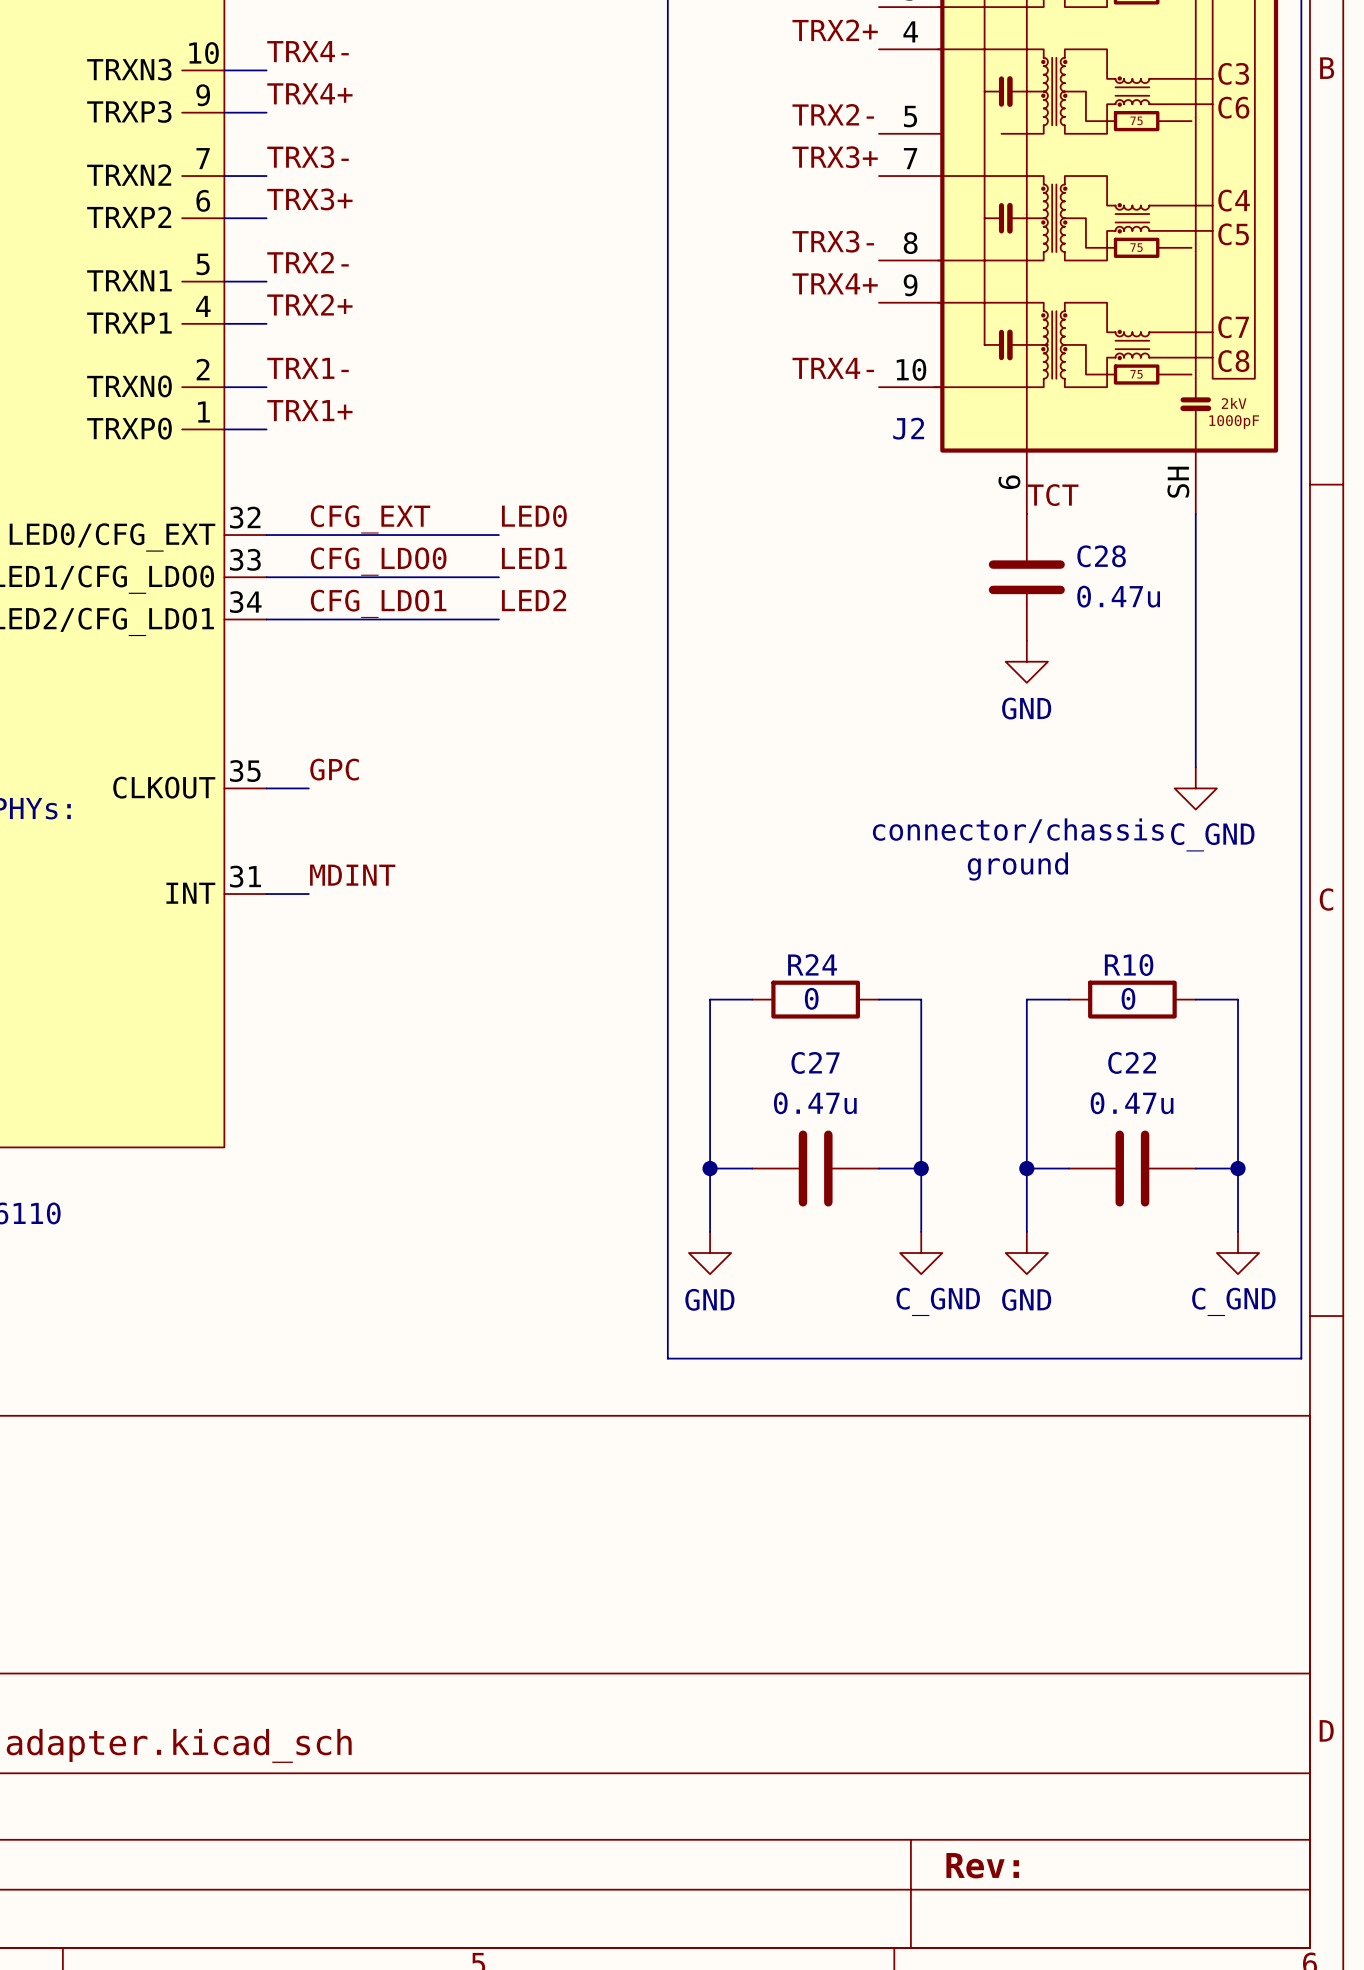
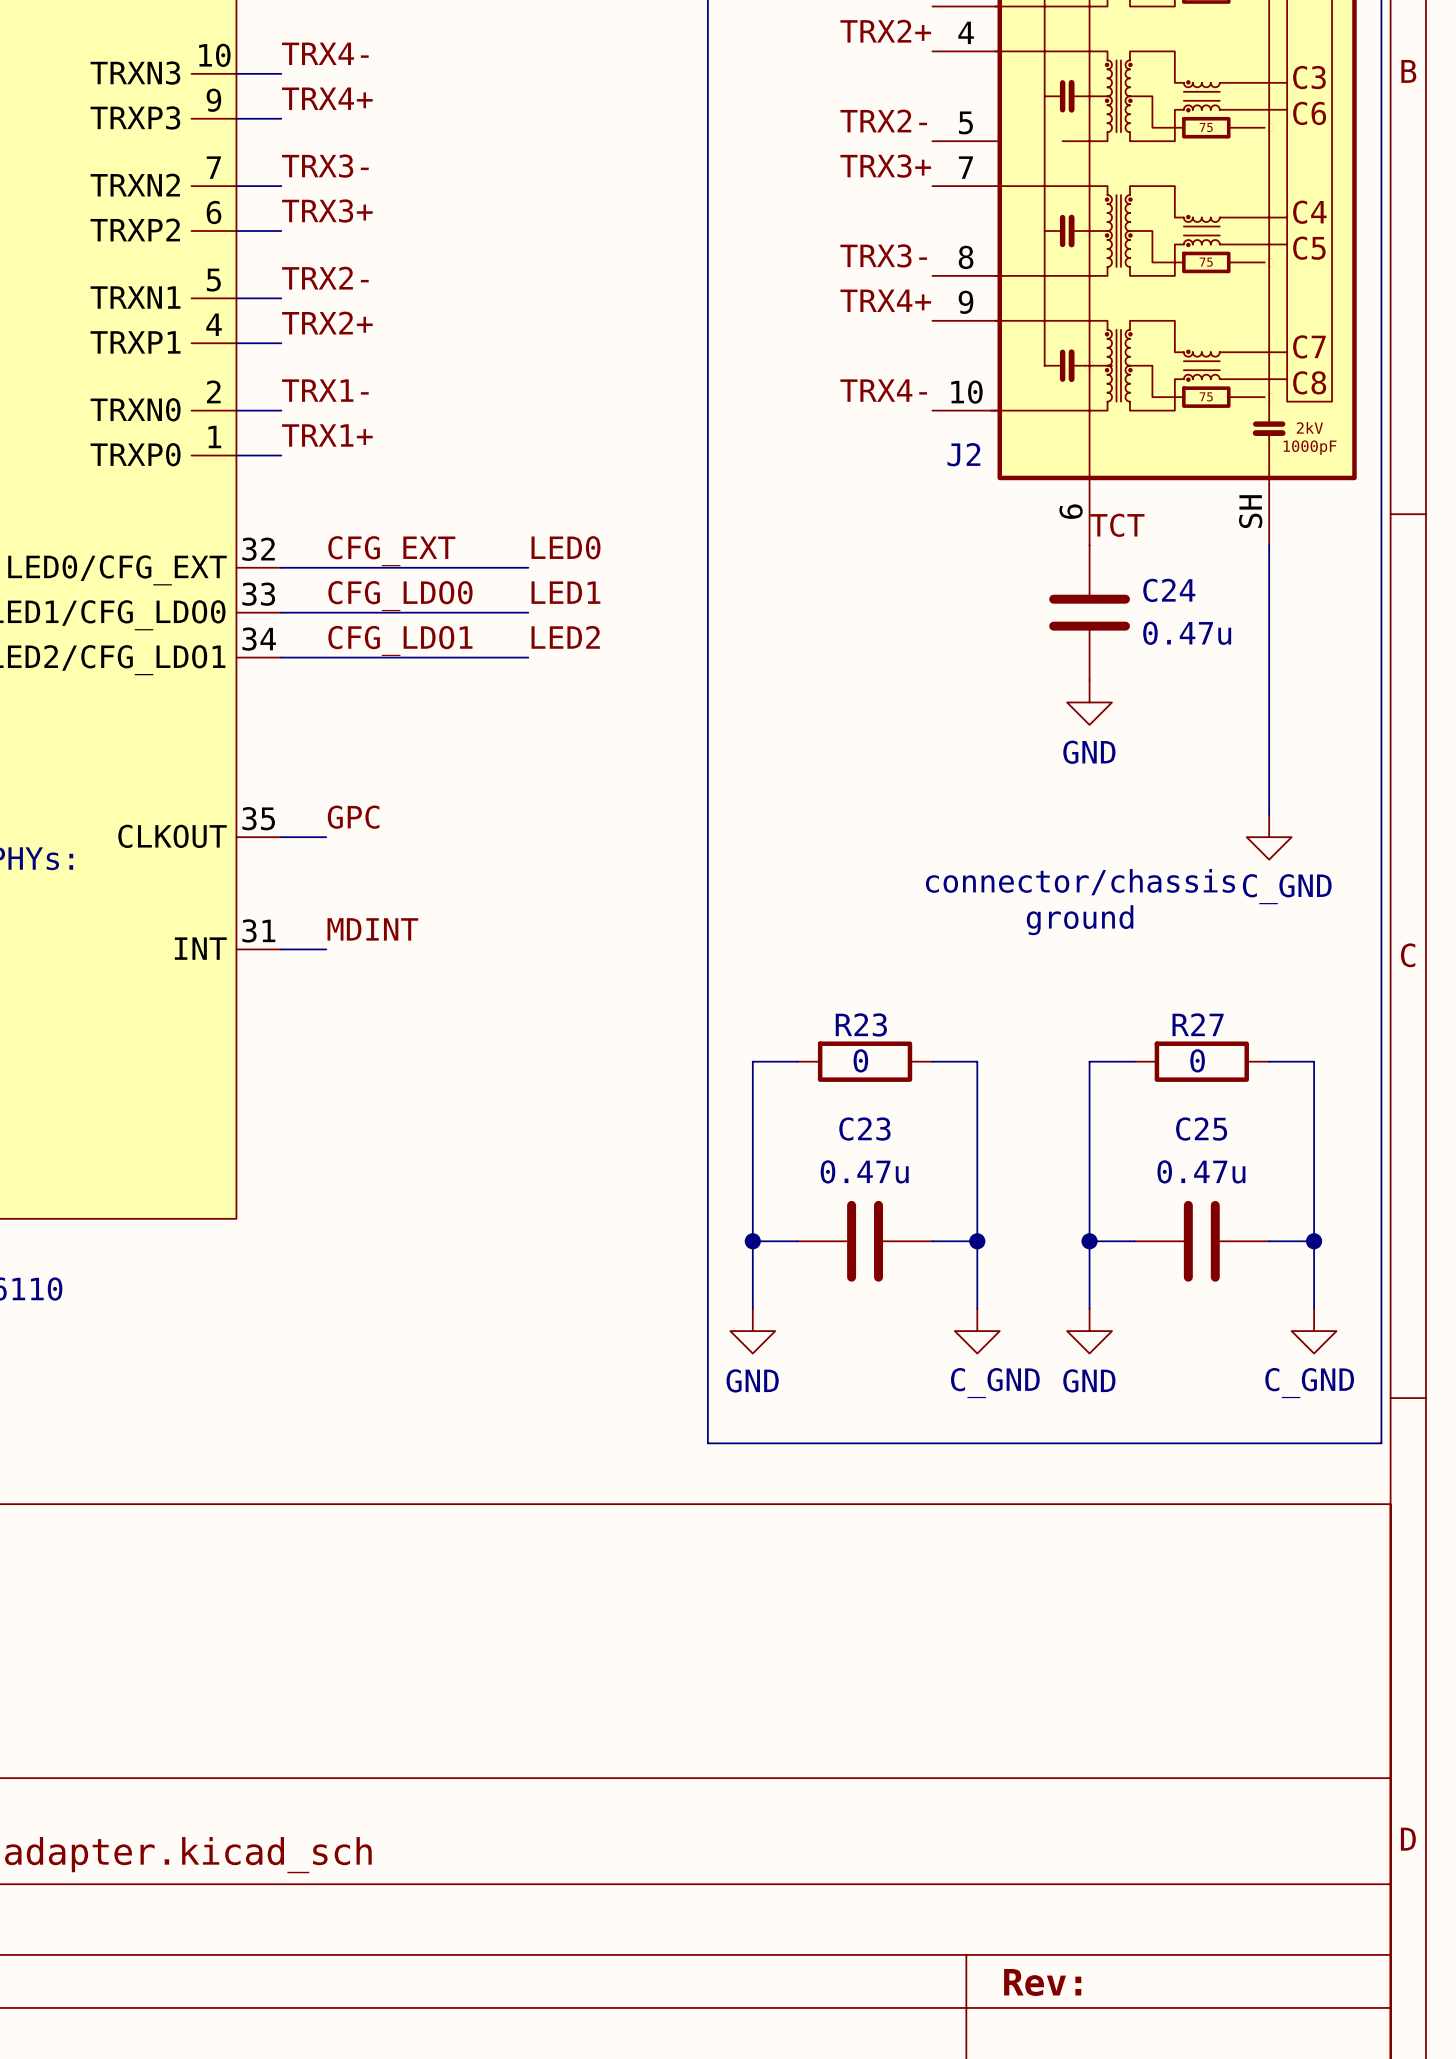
C28 name: C28 (1101, 556) -> C24 (1169, 590)
R24 name: R24 (812, 964) -> R23 (861, 1024)
R10 name: R10 (1129, 965) -> R27 (1198, 1024)
C27 name: C27 (815, 1062) -> C23 (864, 1129)
C22 name: C22 (1132, 1062) -> C25 (1201, 1129)

